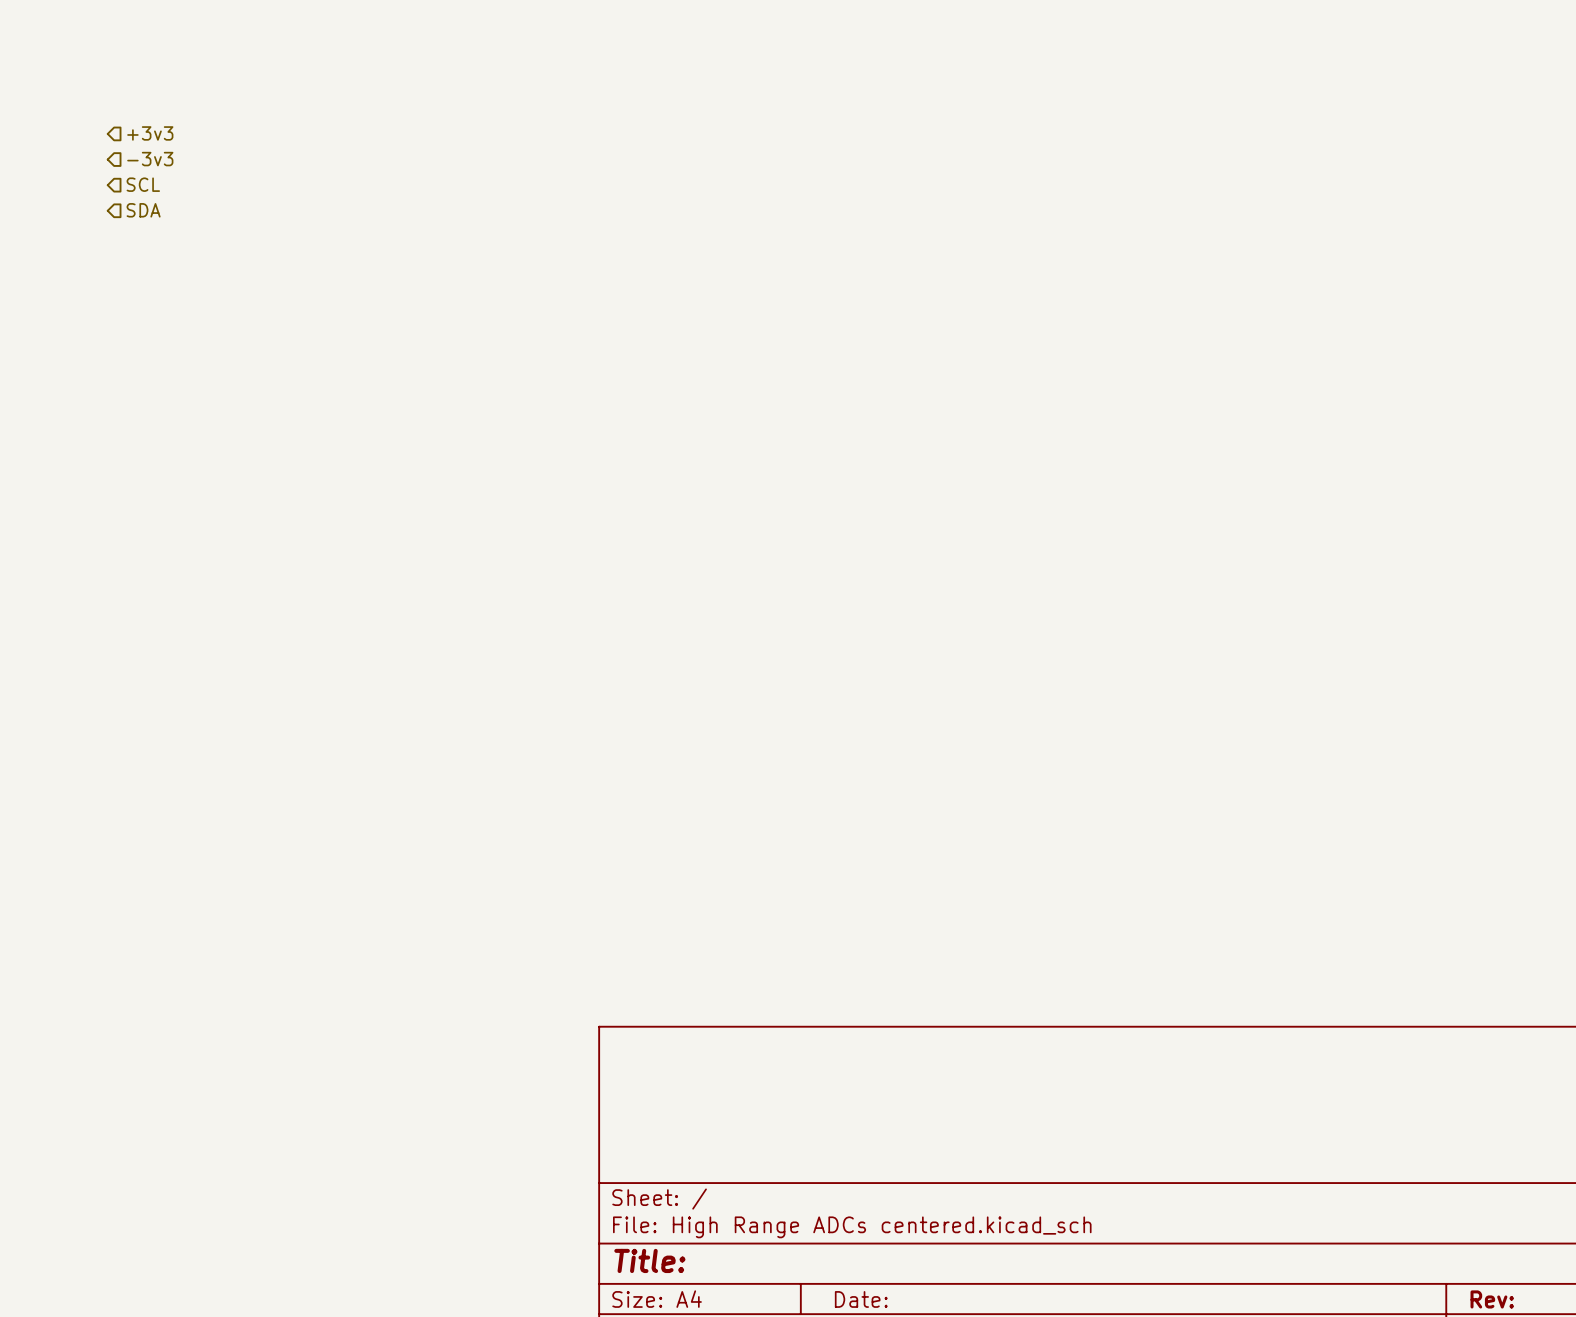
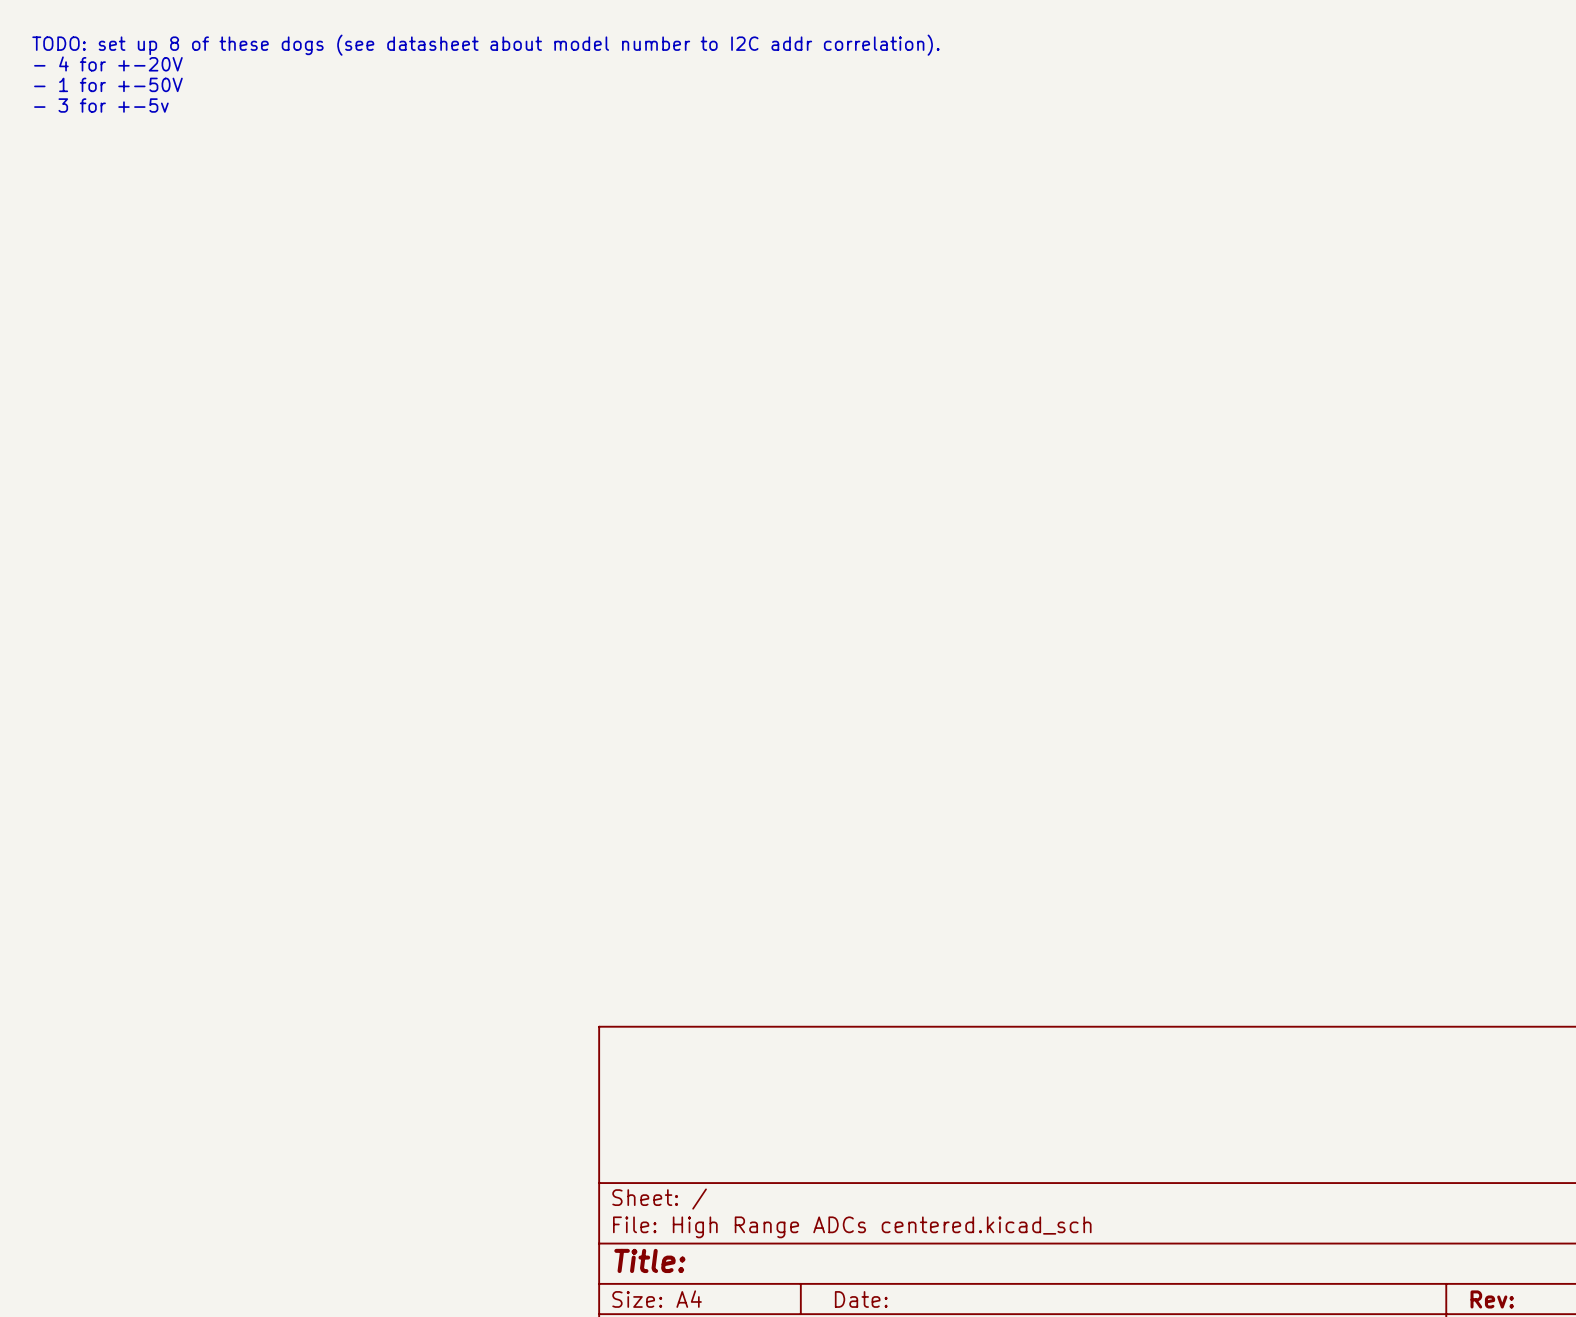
text: none -> TODO: set up 8 of these dogs (see datasheet about model number to I2C addr correlation). (485, 45)
text: none -> - 4 for +-20V (108, 63)
text: none -> - 1 for +-50V (108, 84)
text: none -> - 3 for +-5v (101, 105)
hierarchical label: +3v3 (150, 133) -> none
hierarchical label: -3v3 (150, 159) -> none
hierarchical label: SCL (143, 184) -> none
hierarchical label: SDA (143, 210) -> none

